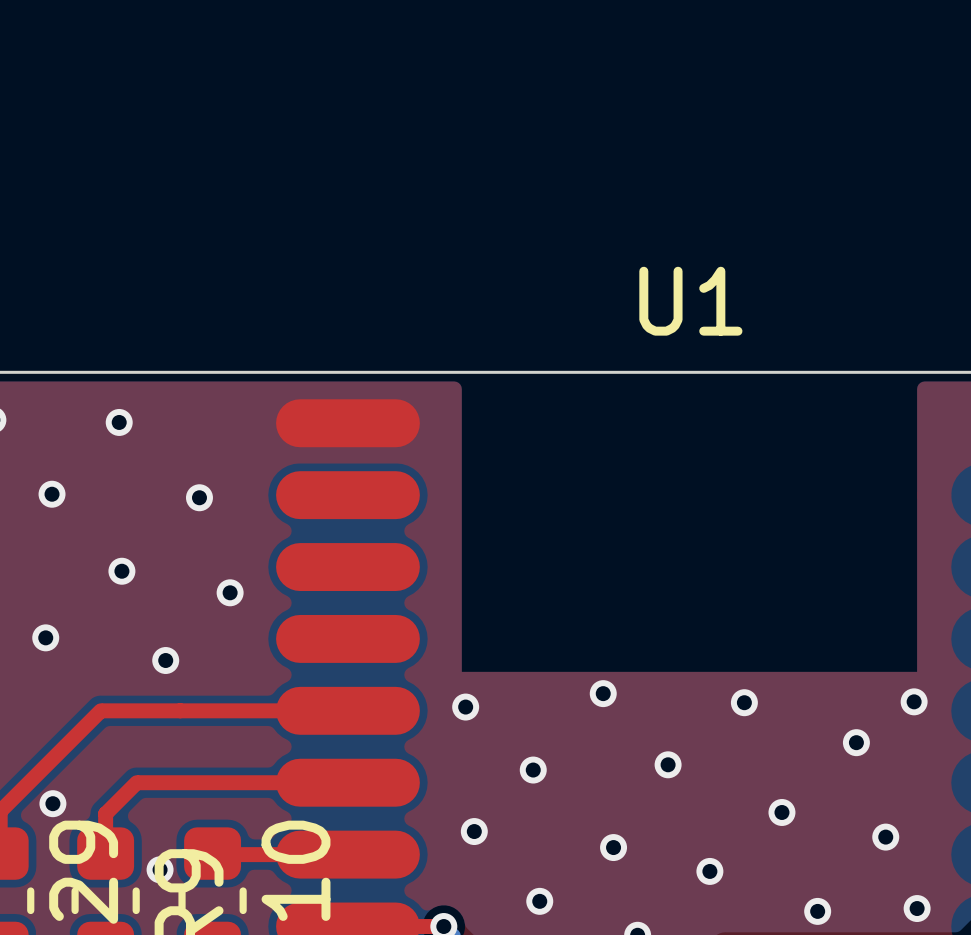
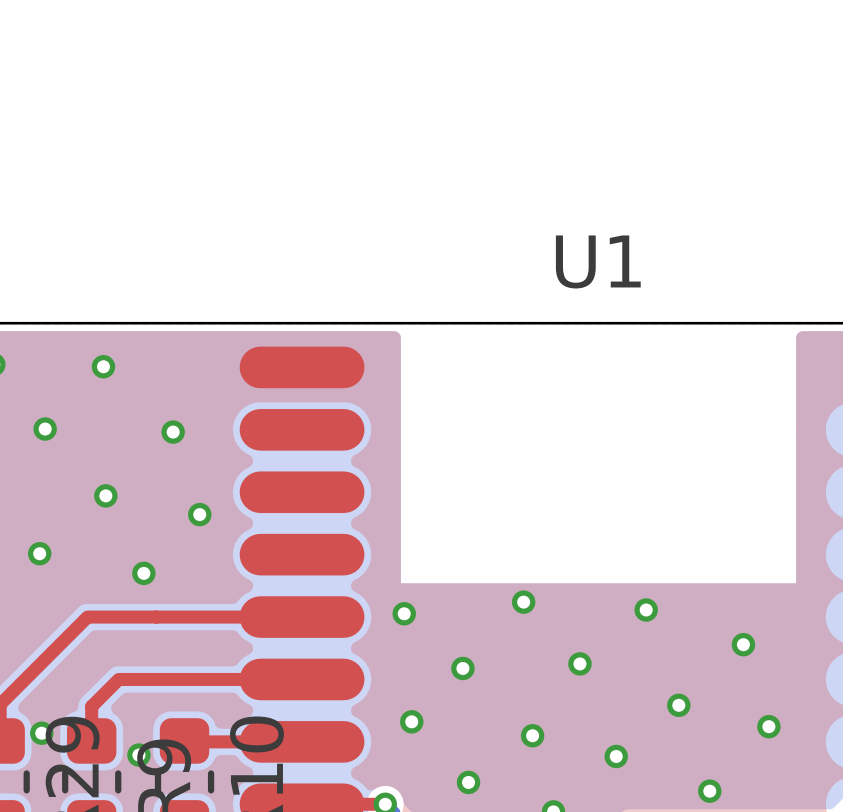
via: (914, 701) -> none
via position: (52, 803) -> (41, 733)
via: (917, 908) -> none

